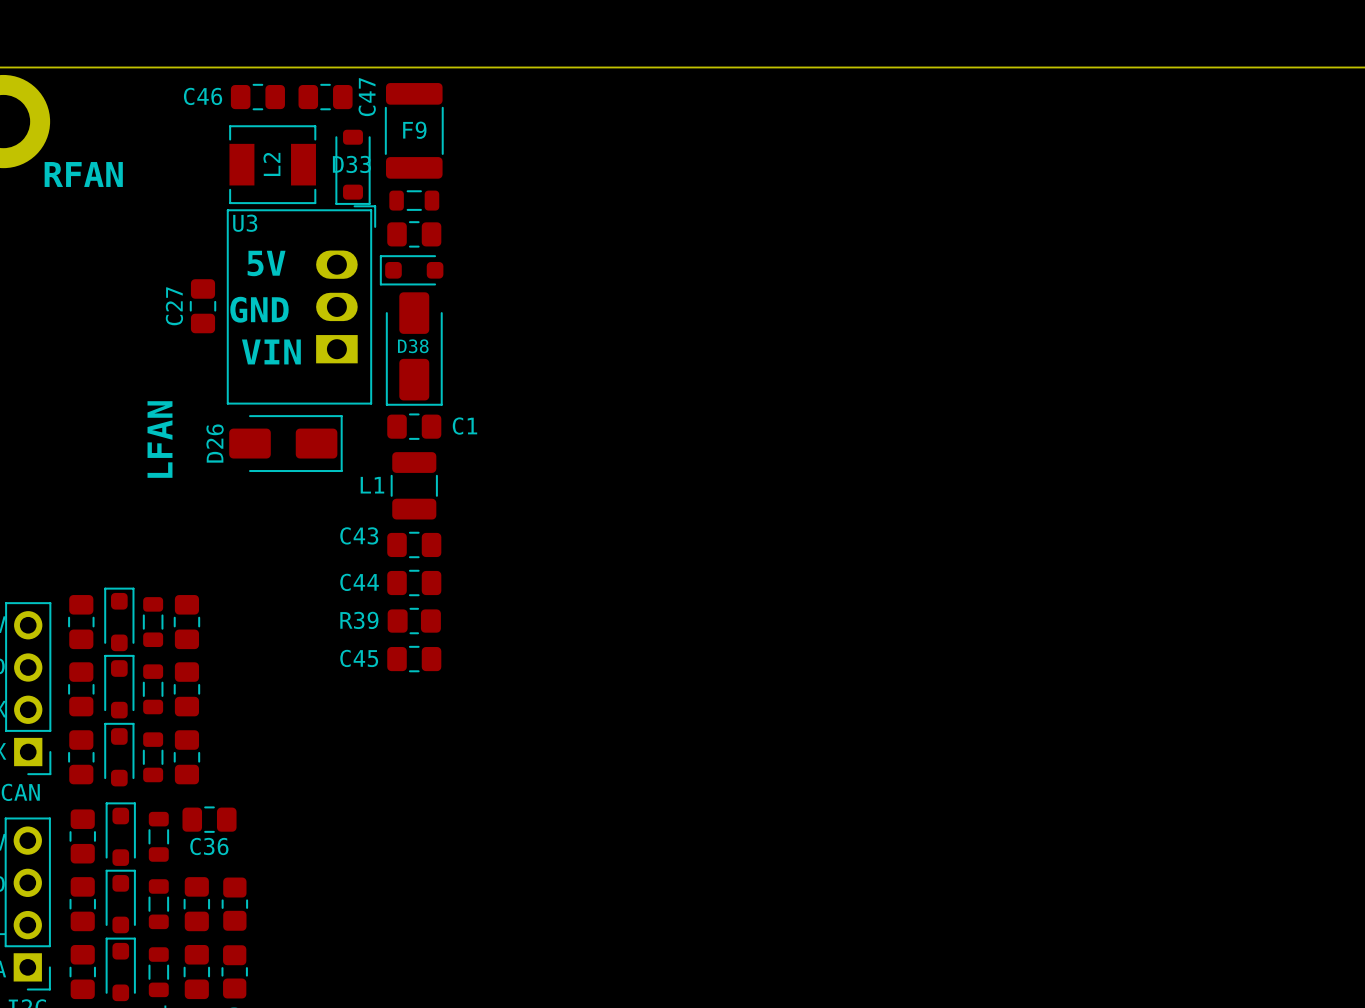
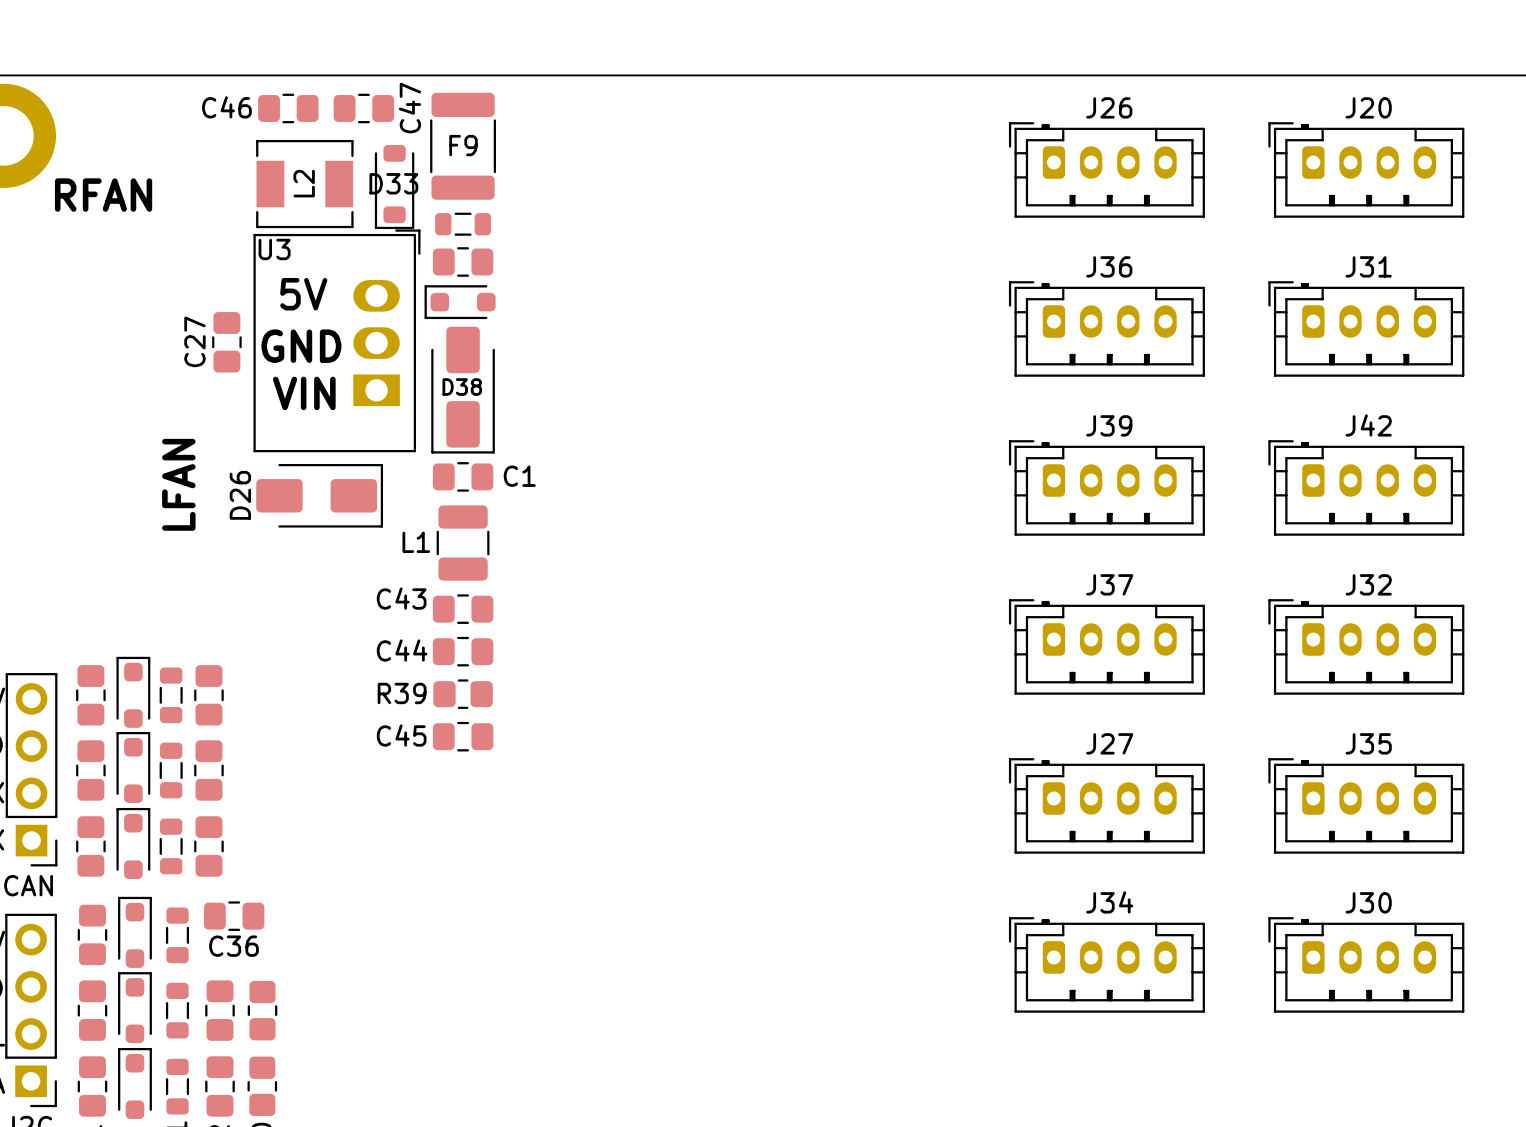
J26: none -> (1106, 169)
J20: none -> (1366, 169)
J36: none -> (1106, 328)
J31: none -> (1366, 328)
J39: none -> (1106, 487)
J42: none -> (1366, 487)
J37: none -> (1106, 646)
J32: none -> (1366, 646)
J27: none -> (1106, 805)
J35: none -> (1366, 805)
J34: none -> (1106, 964)
J30: none -> (1366, 964)

